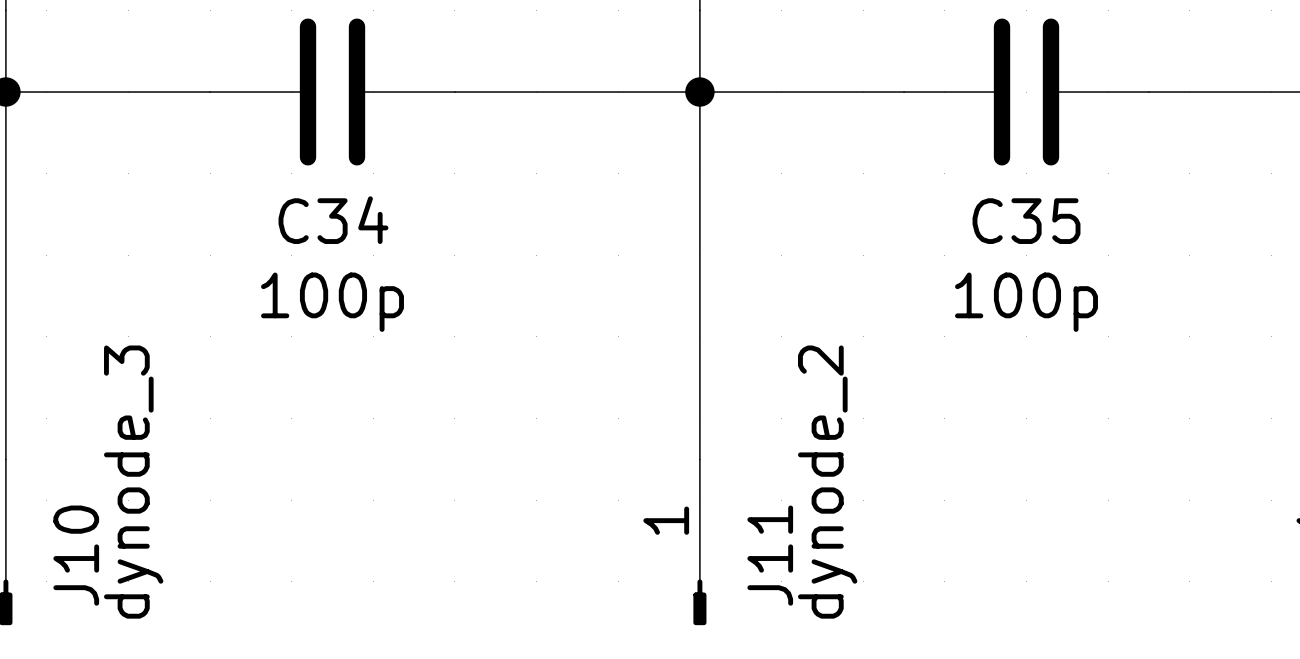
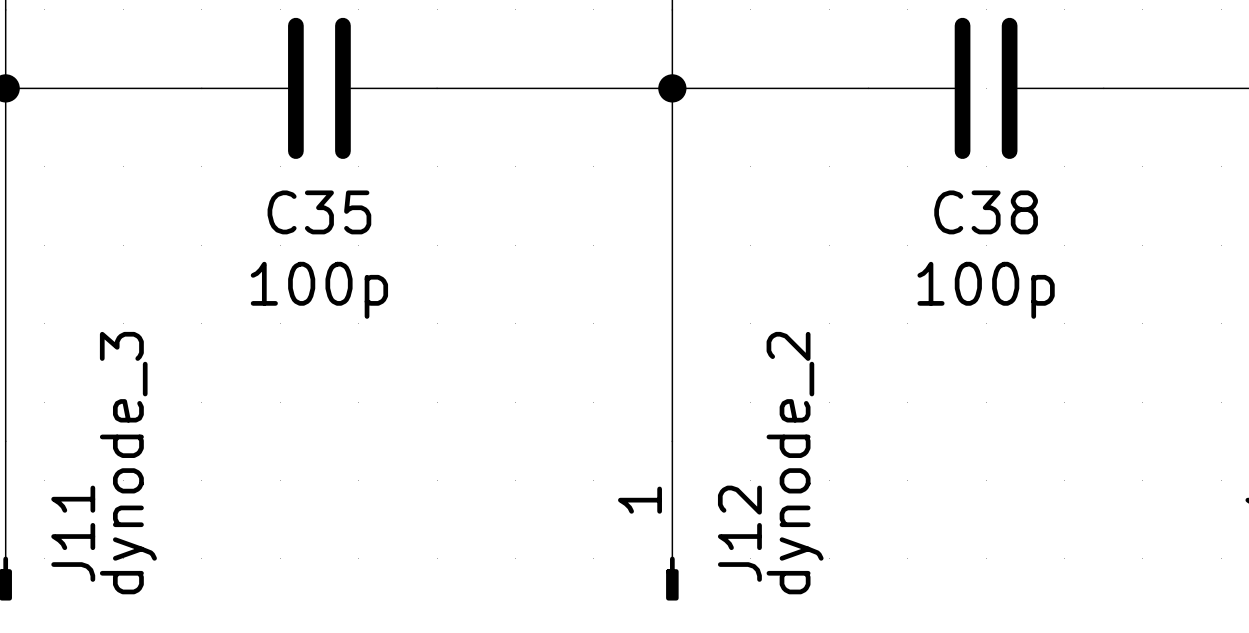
C34 name: C34 (333, 220) -> C35 (319, 212)
C35 name: C35 (1026, 221) -> C38 (986, 212)
J10 name: J10 (76, 555) -> J11 (73, 533)
J11 name: J11 (770, 555) -> J12 (739, 533)

